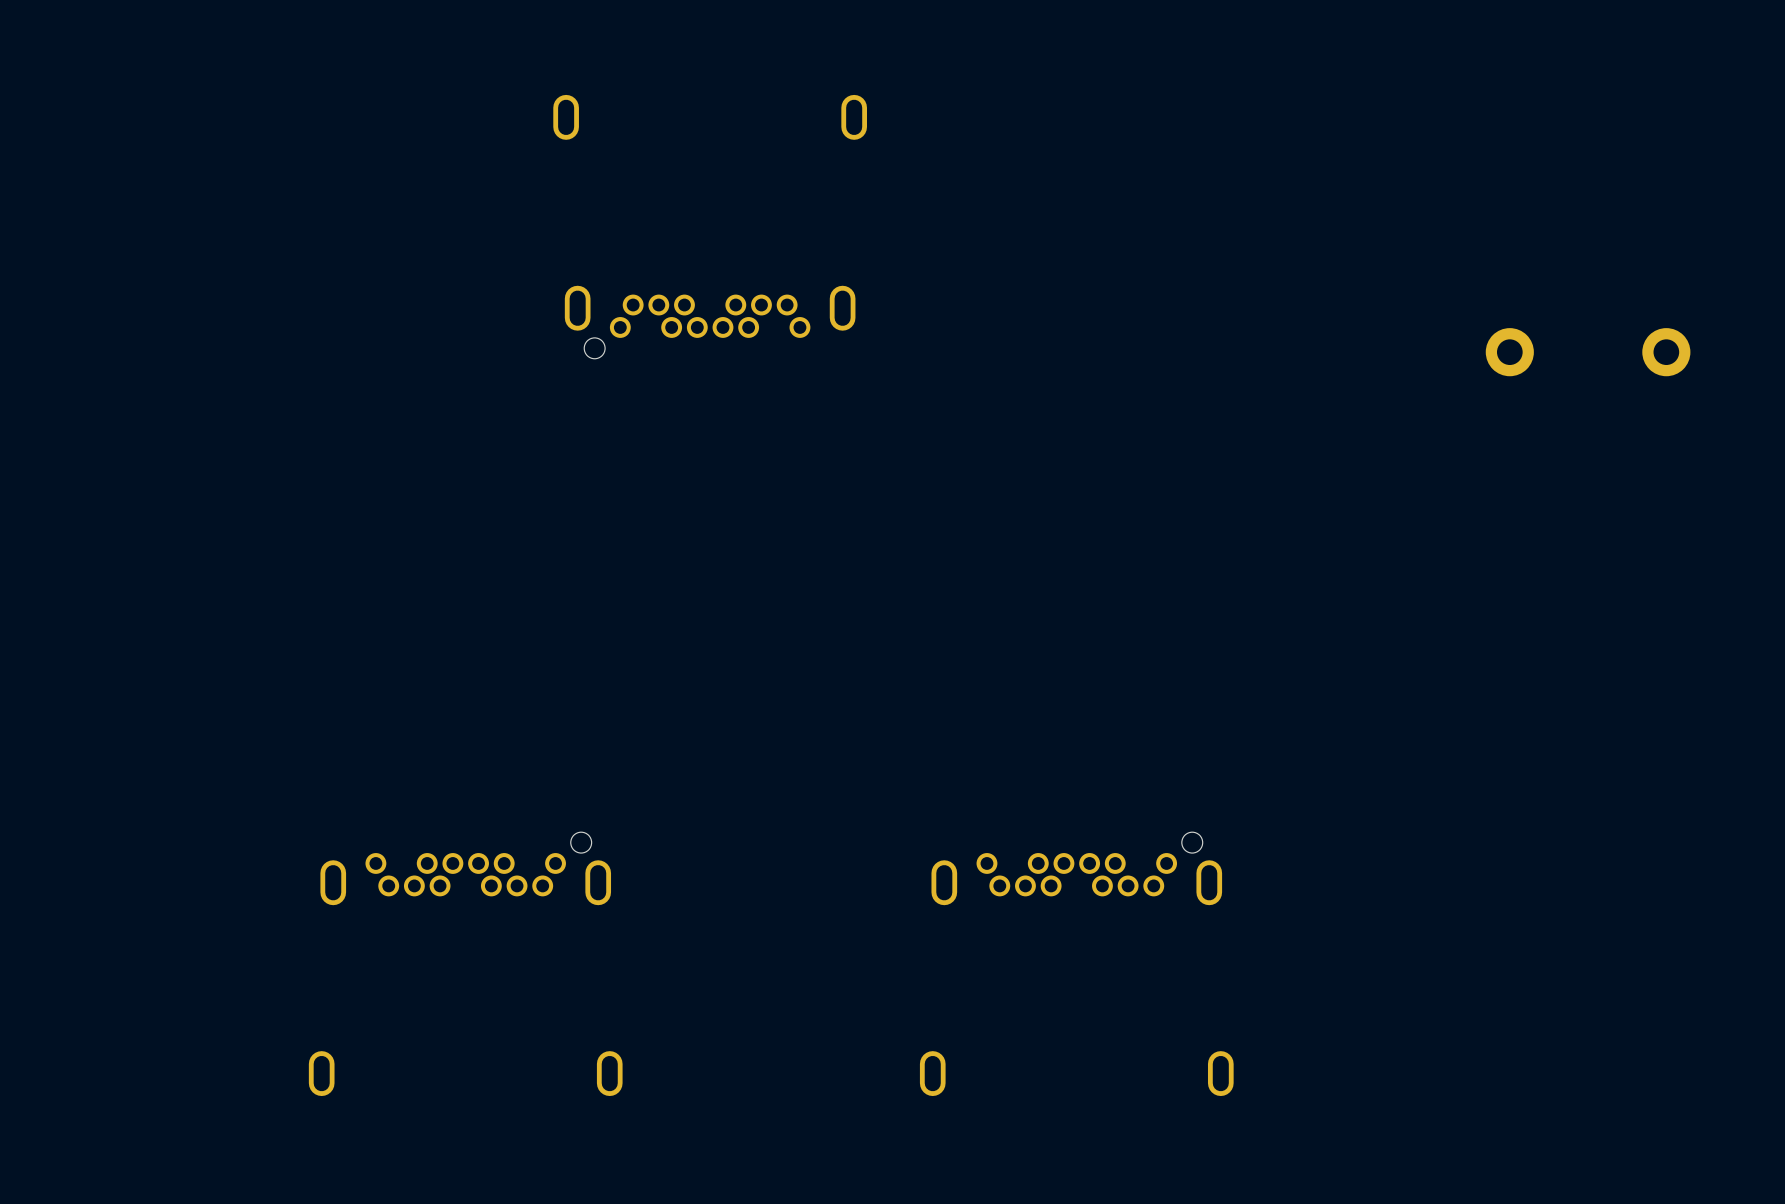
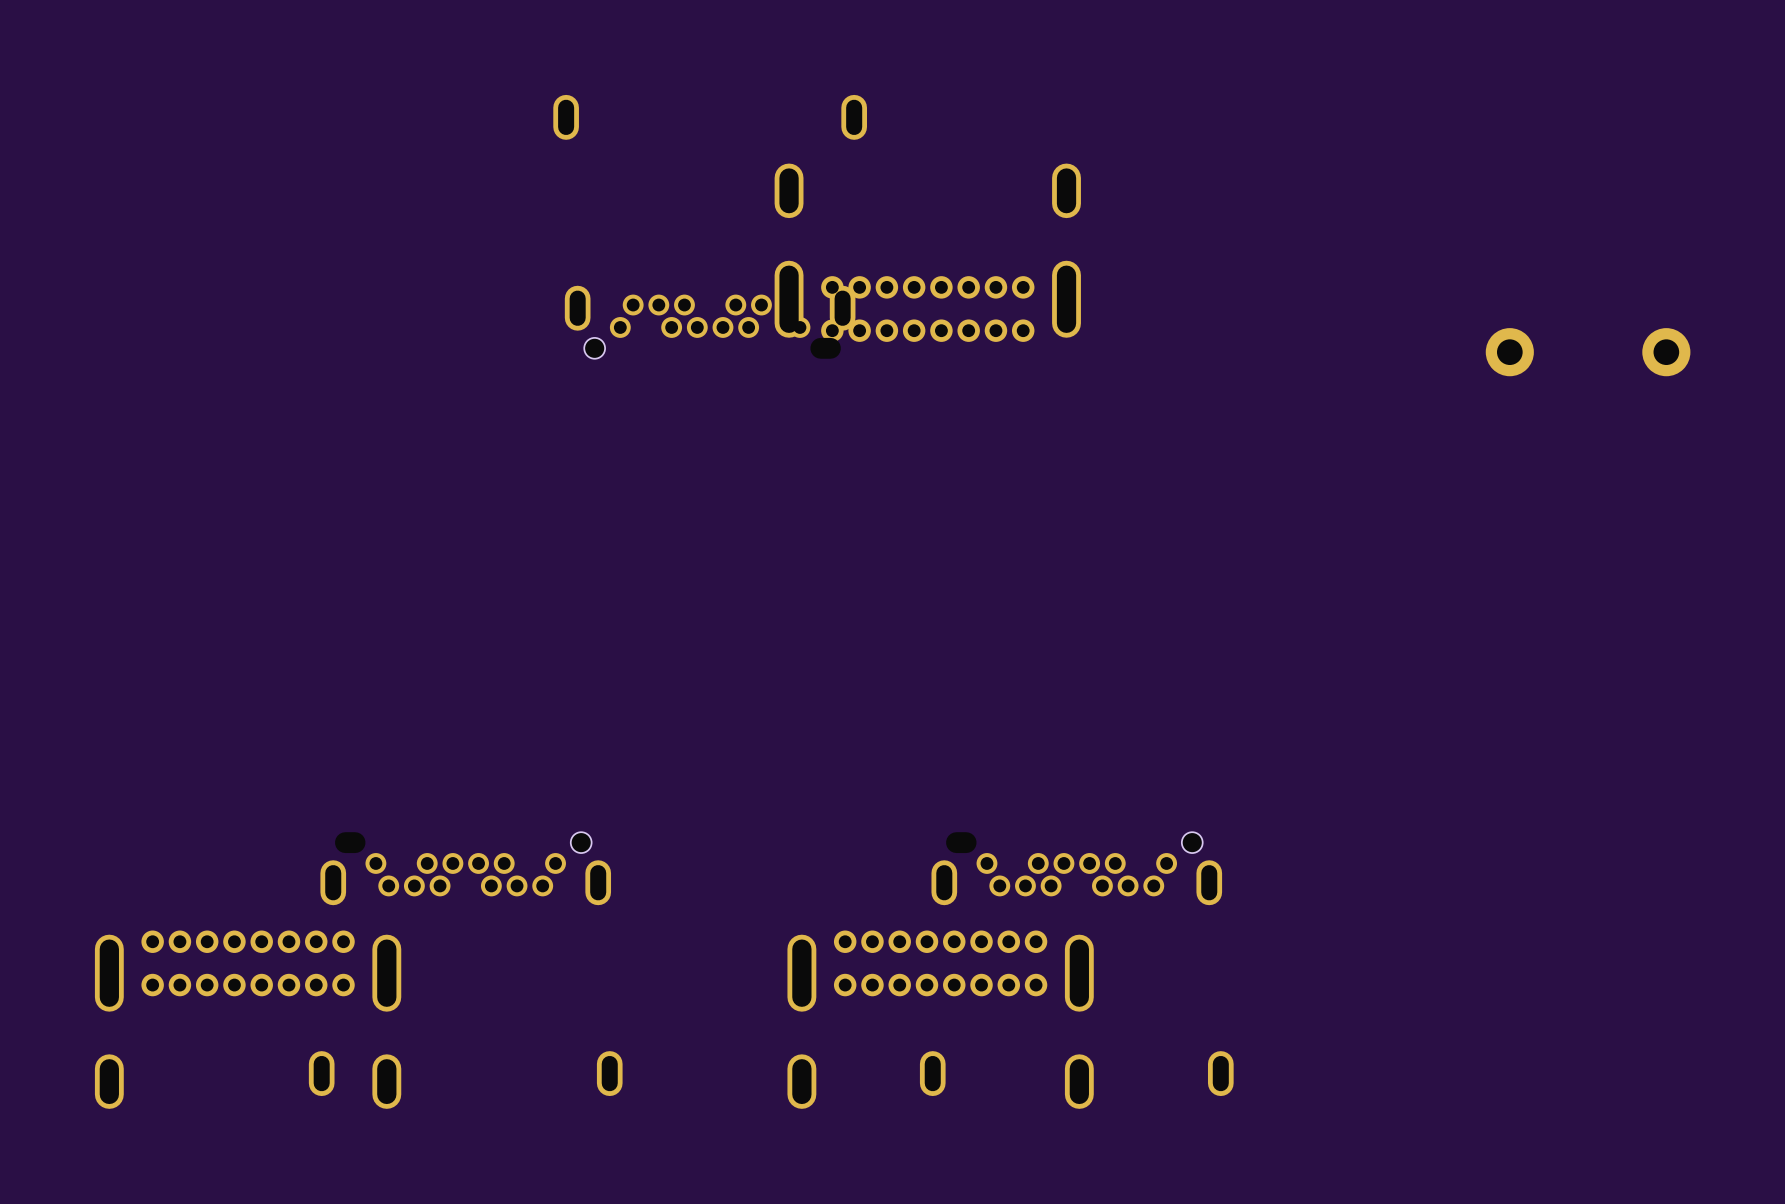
part: none -> (927, 252)
part: none -> (248, 1019)
part: none -> (940, 1019)

